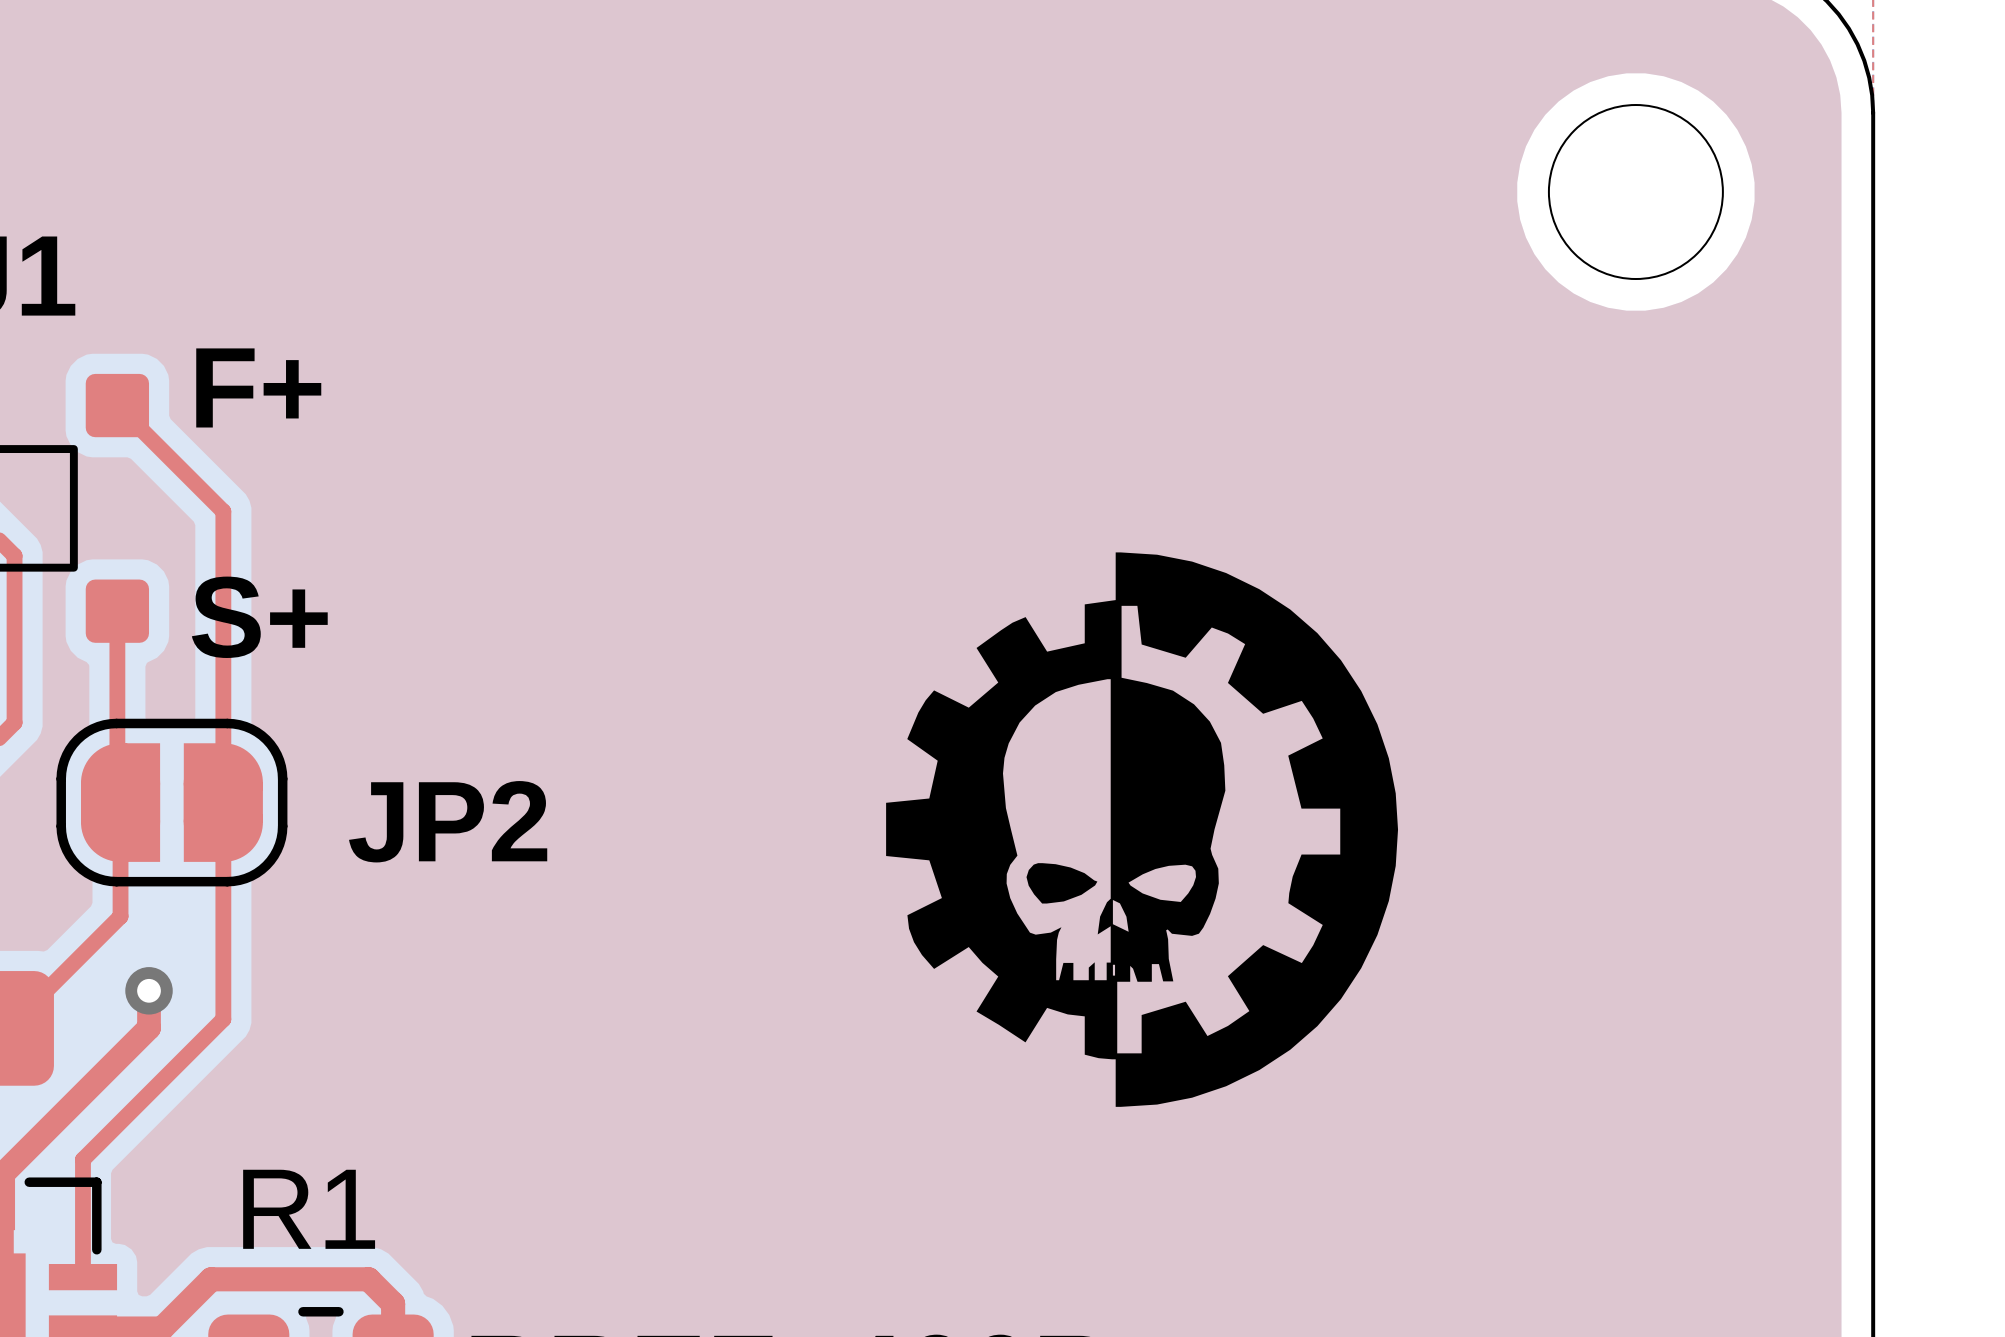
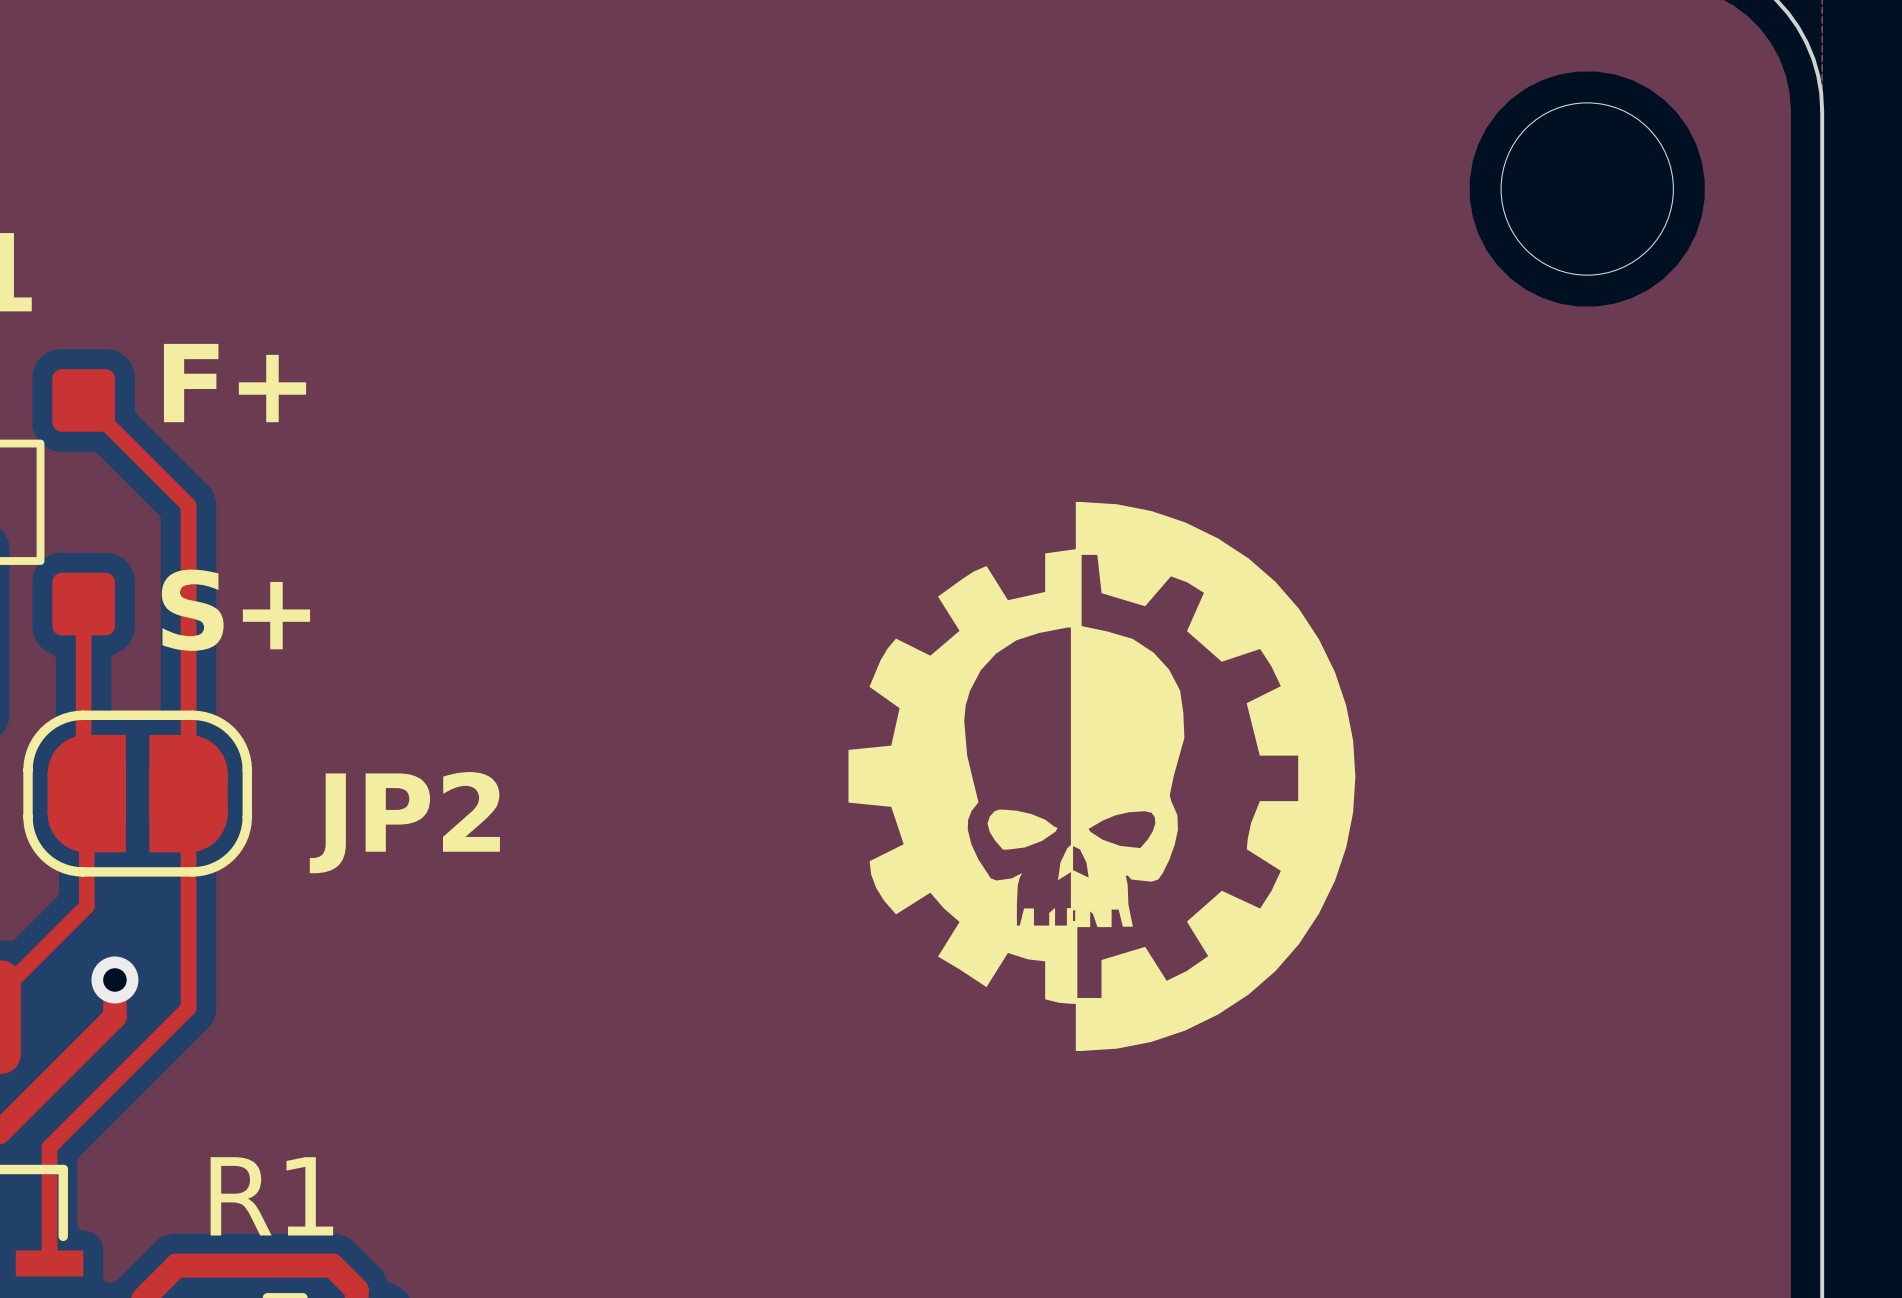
drawing position: (1142, 829) -> (1101, 776)
drawing position: (1061, 883) -> (1022, 829)

